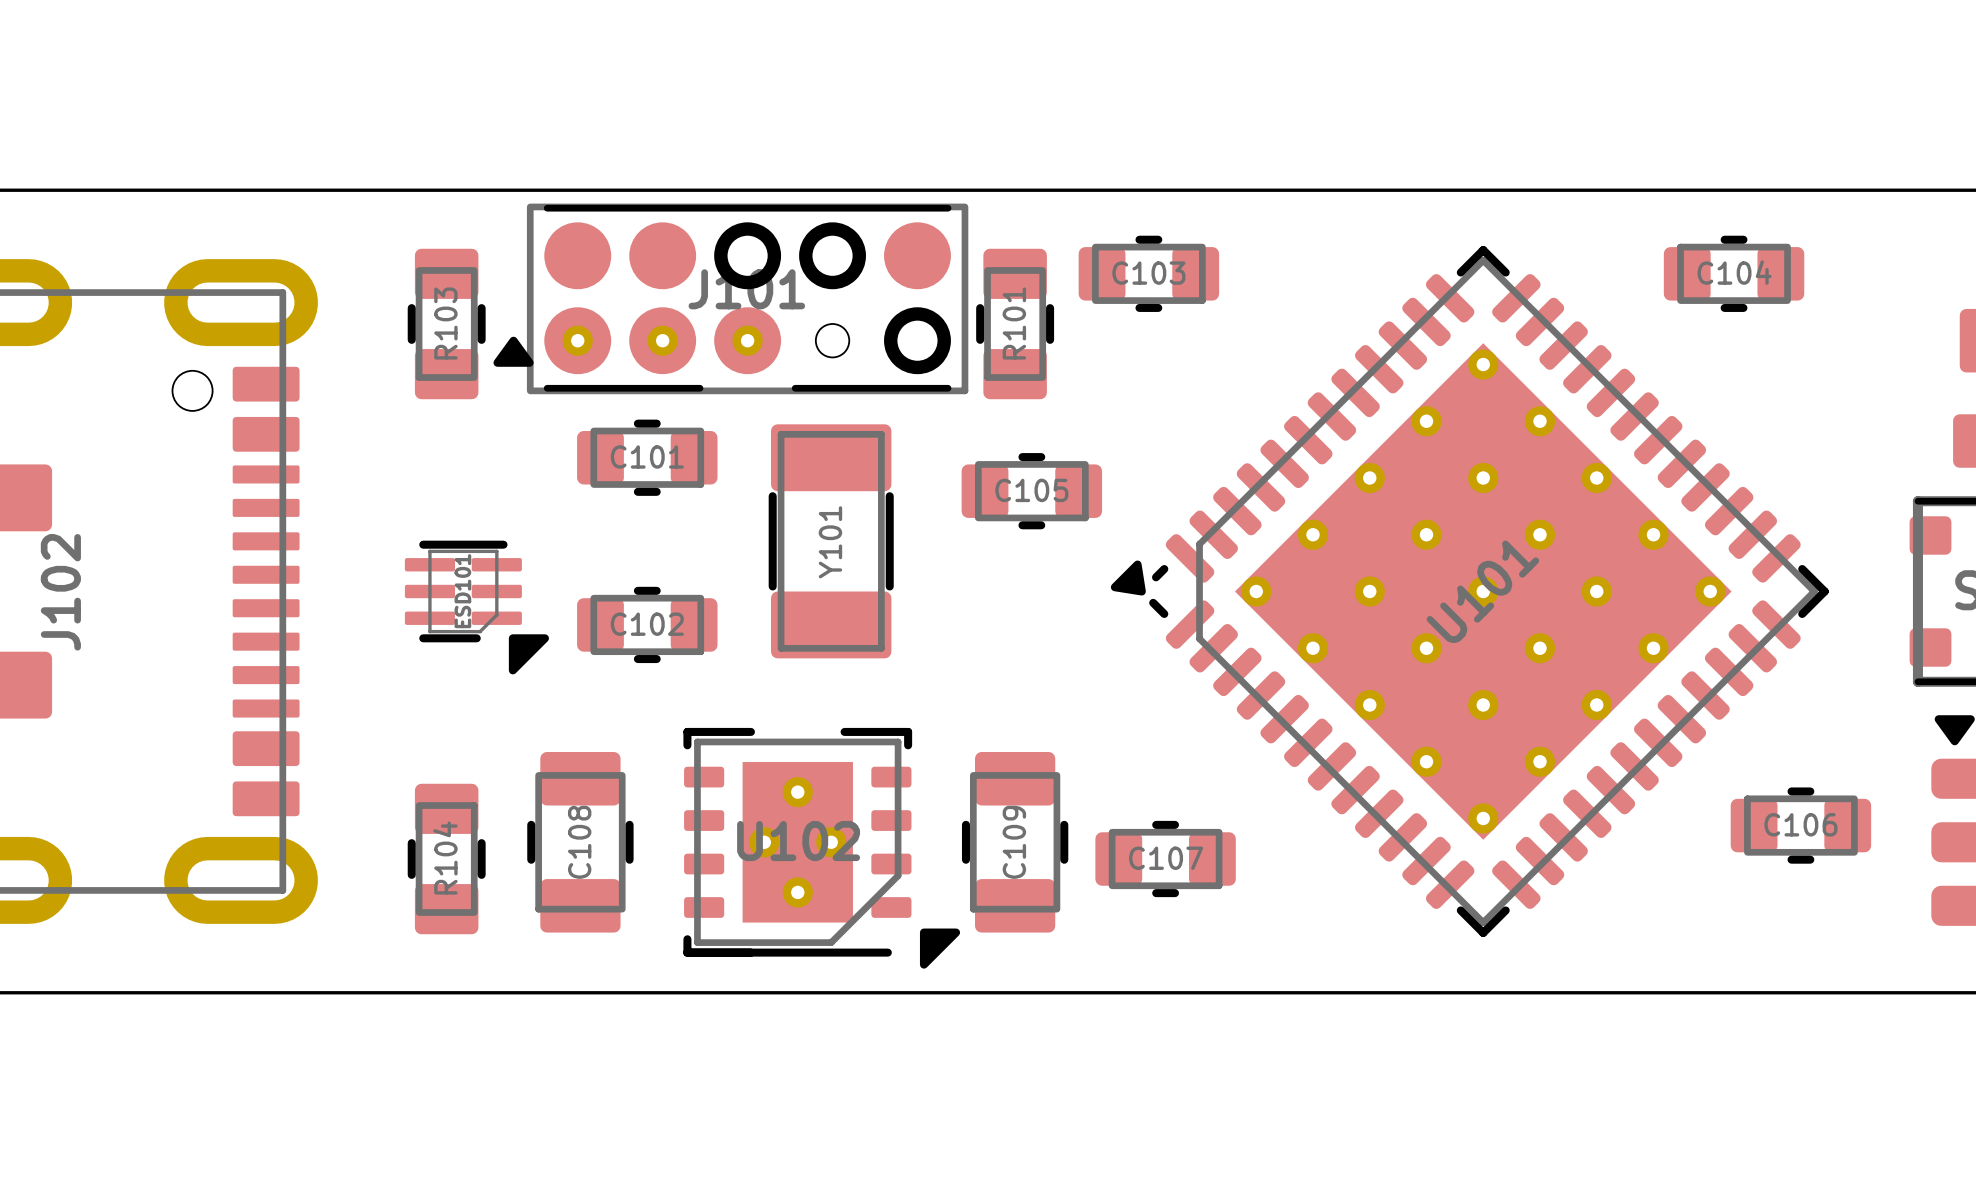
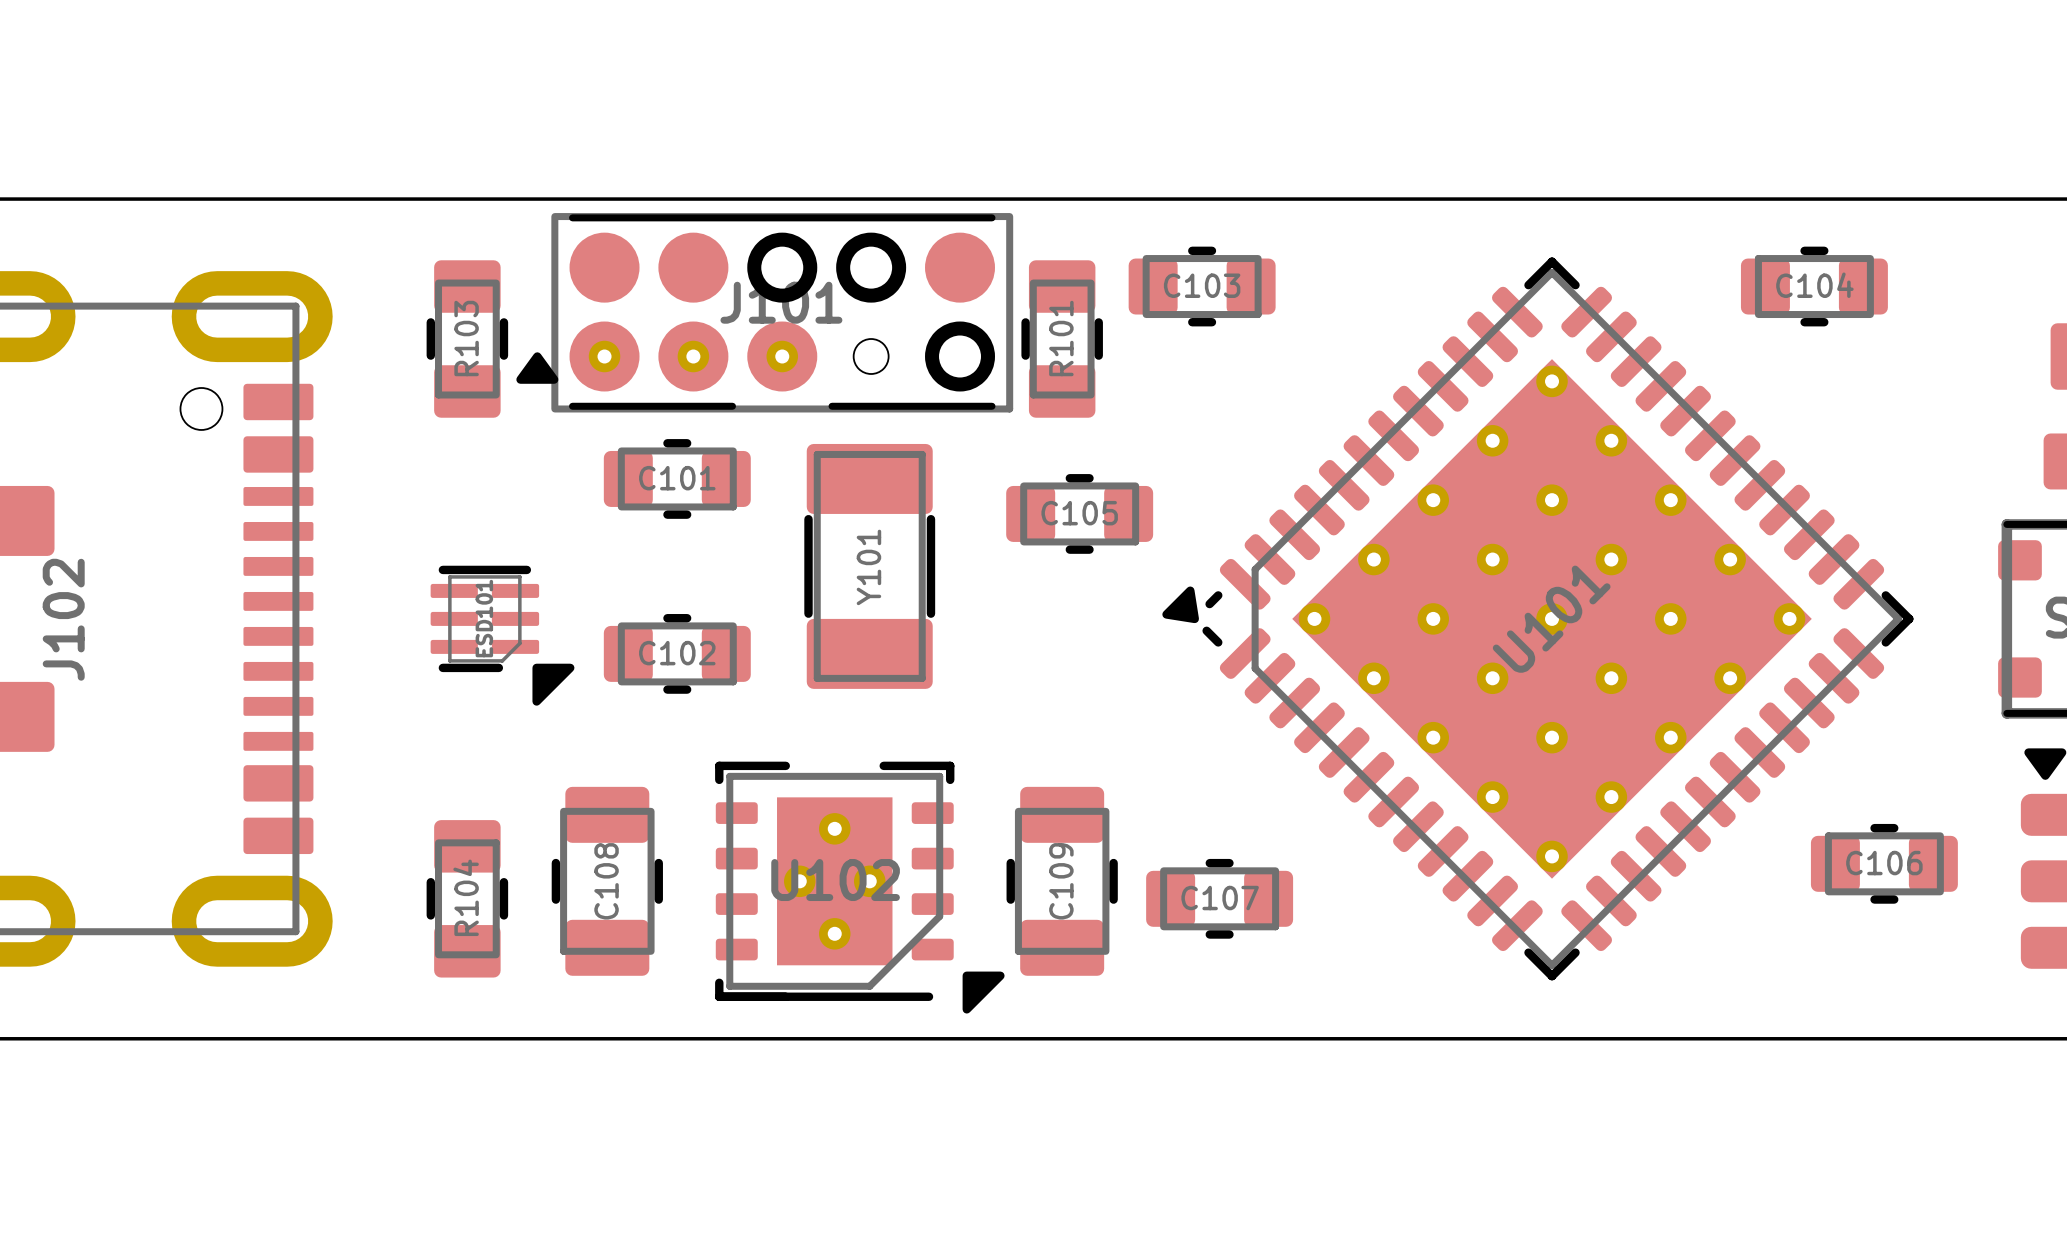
ESD101 footprint: [404, 540, 549, 675] -> [430, 565, 575, 706]

